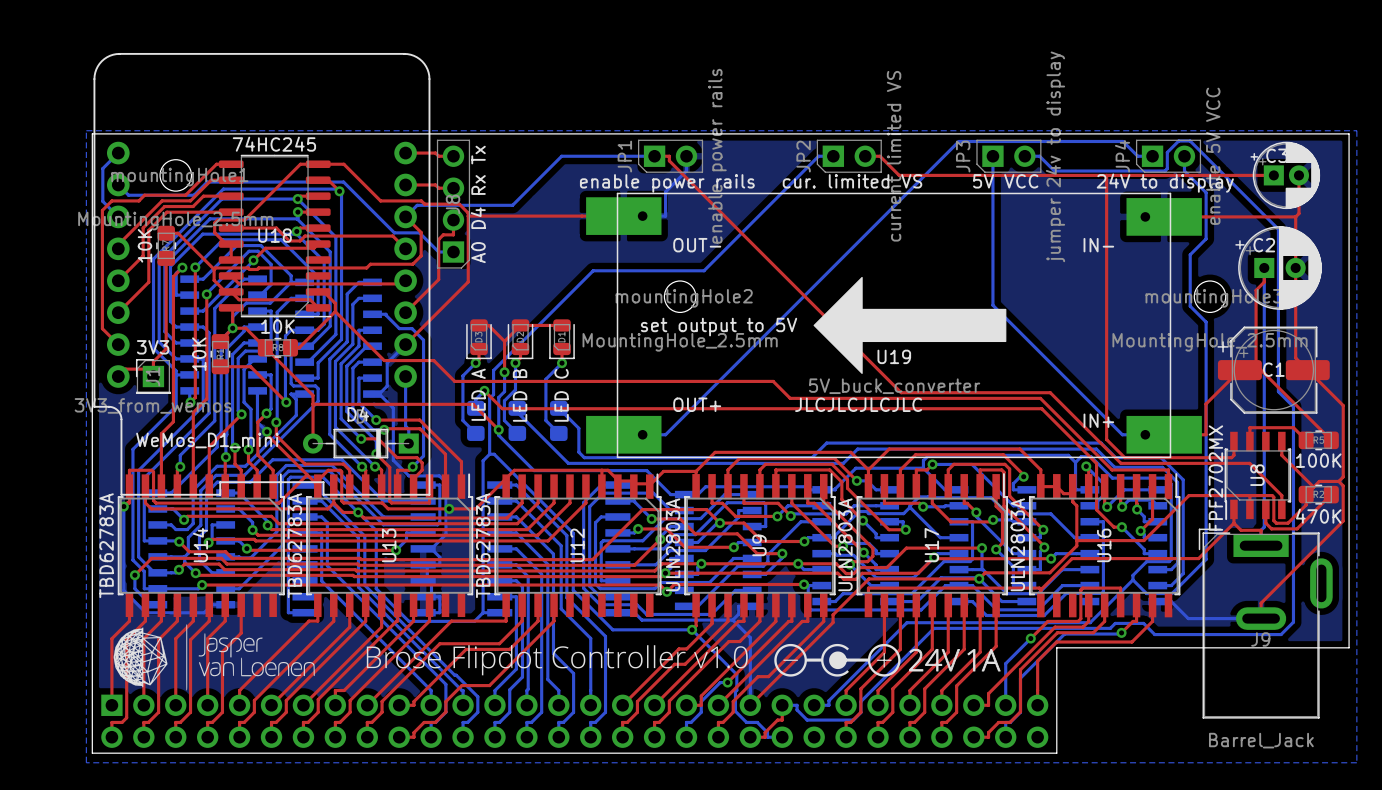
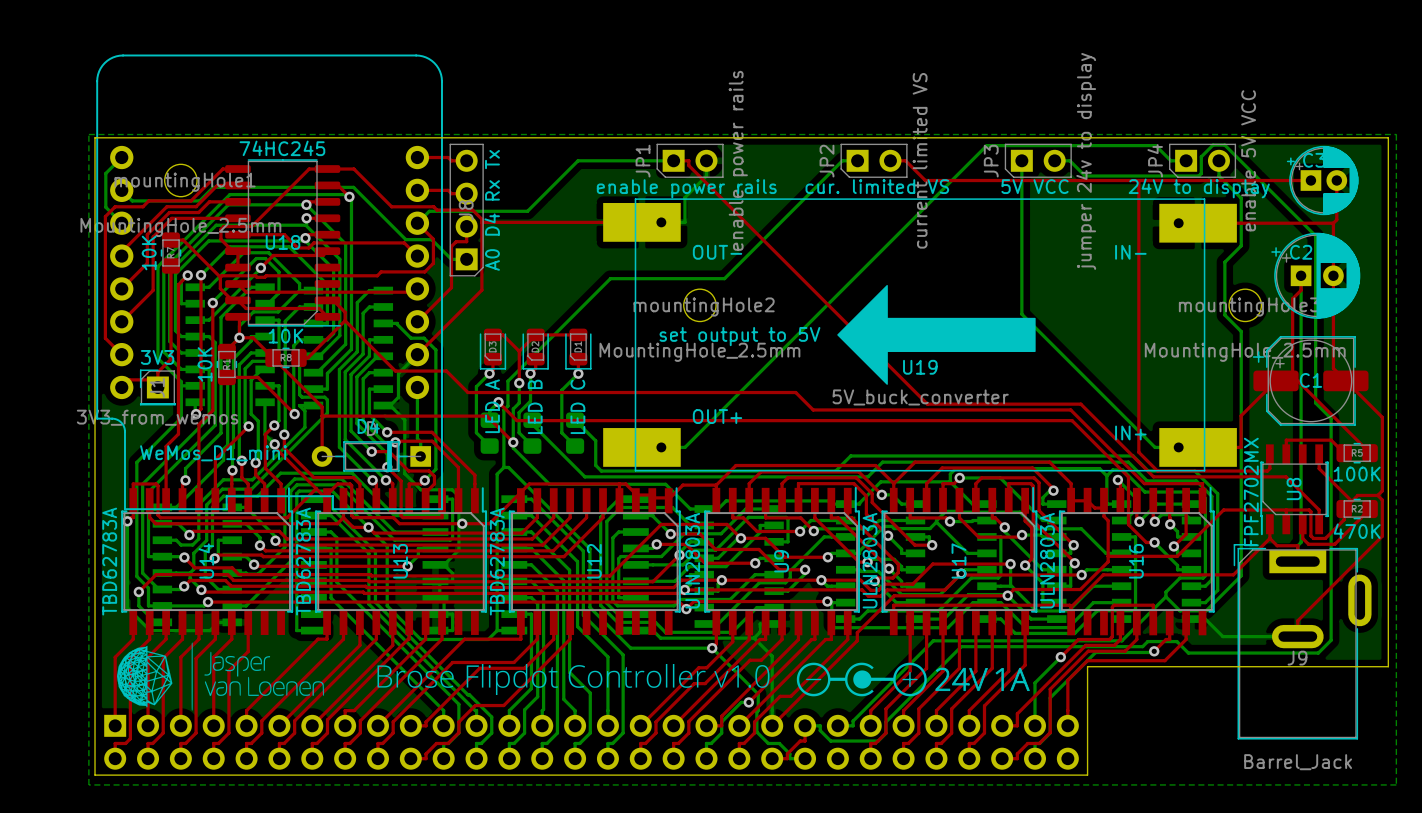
text: JLCJLCJLCJLC (858, 404) -> none

